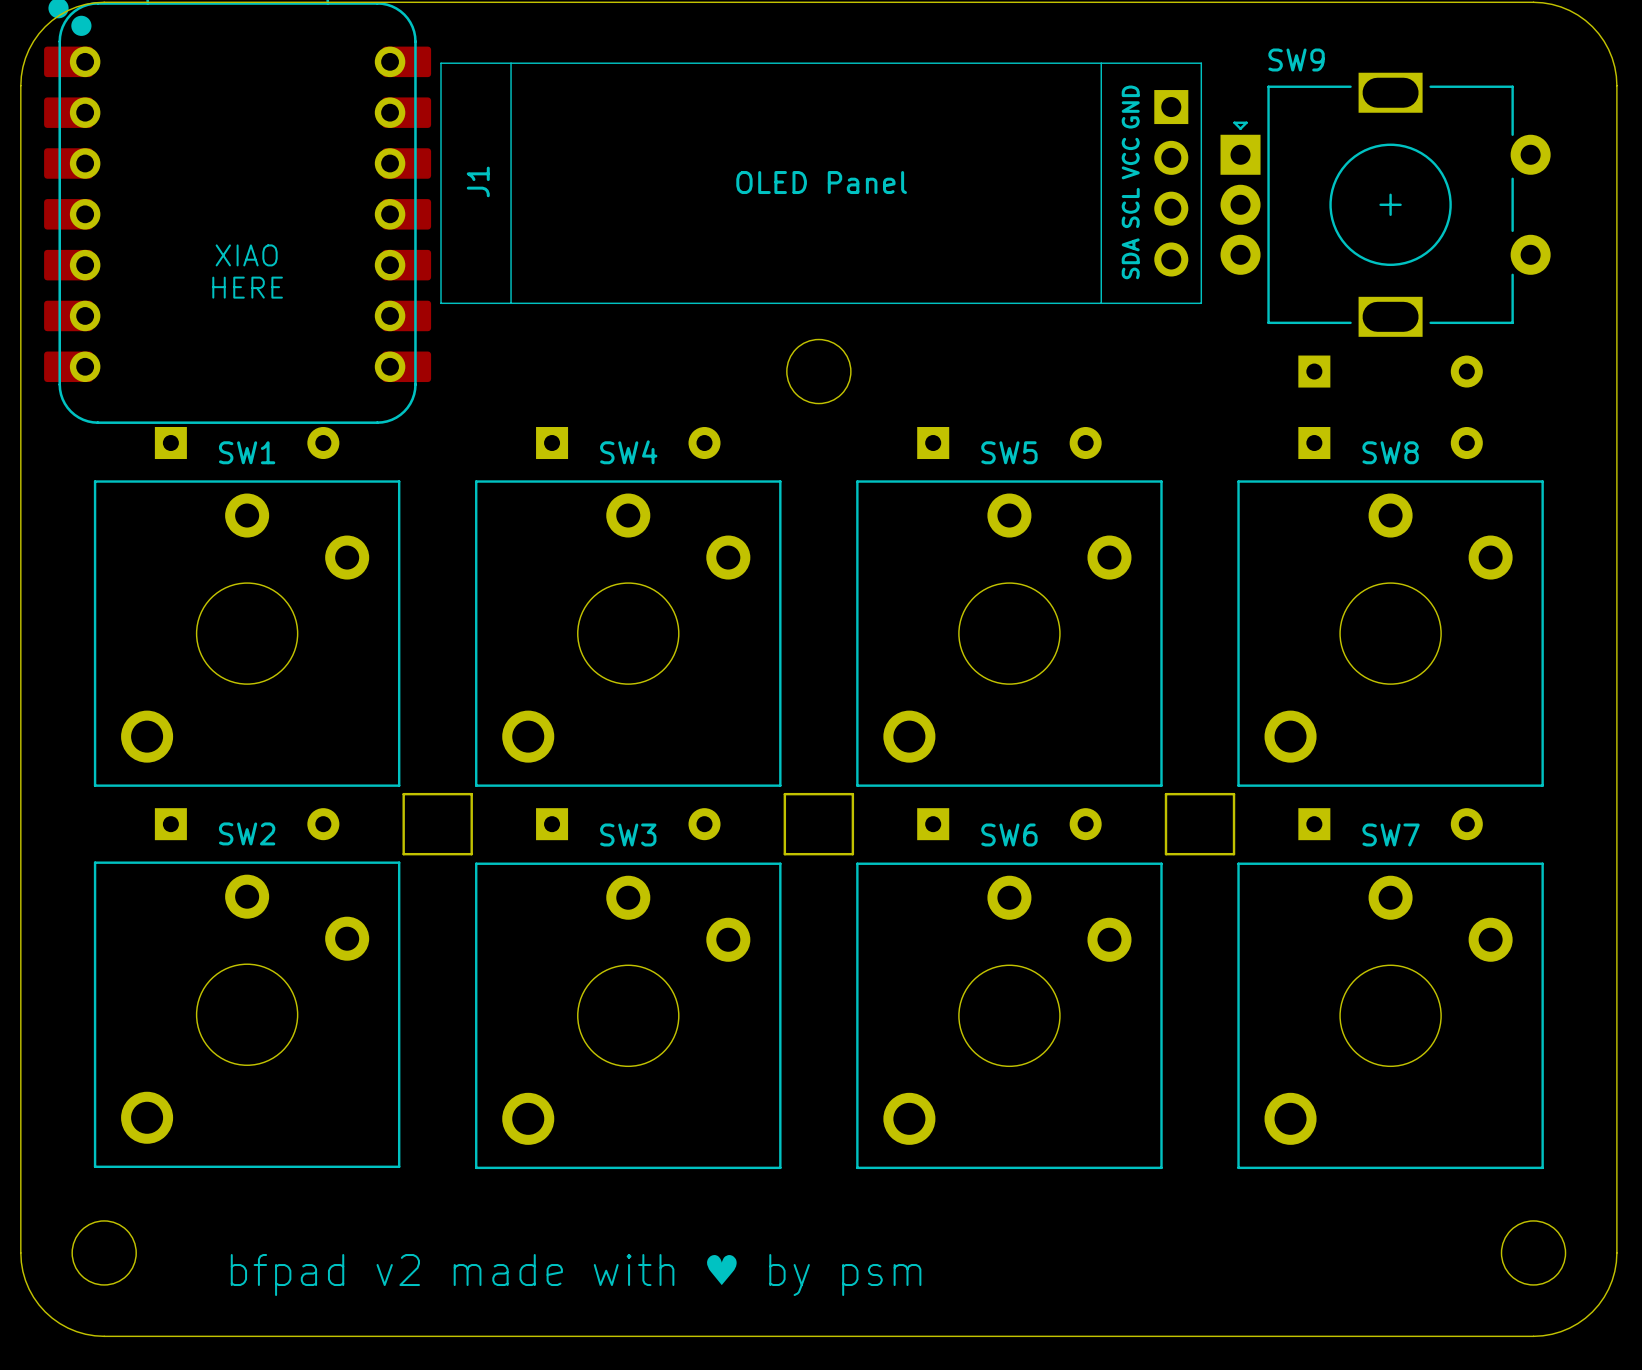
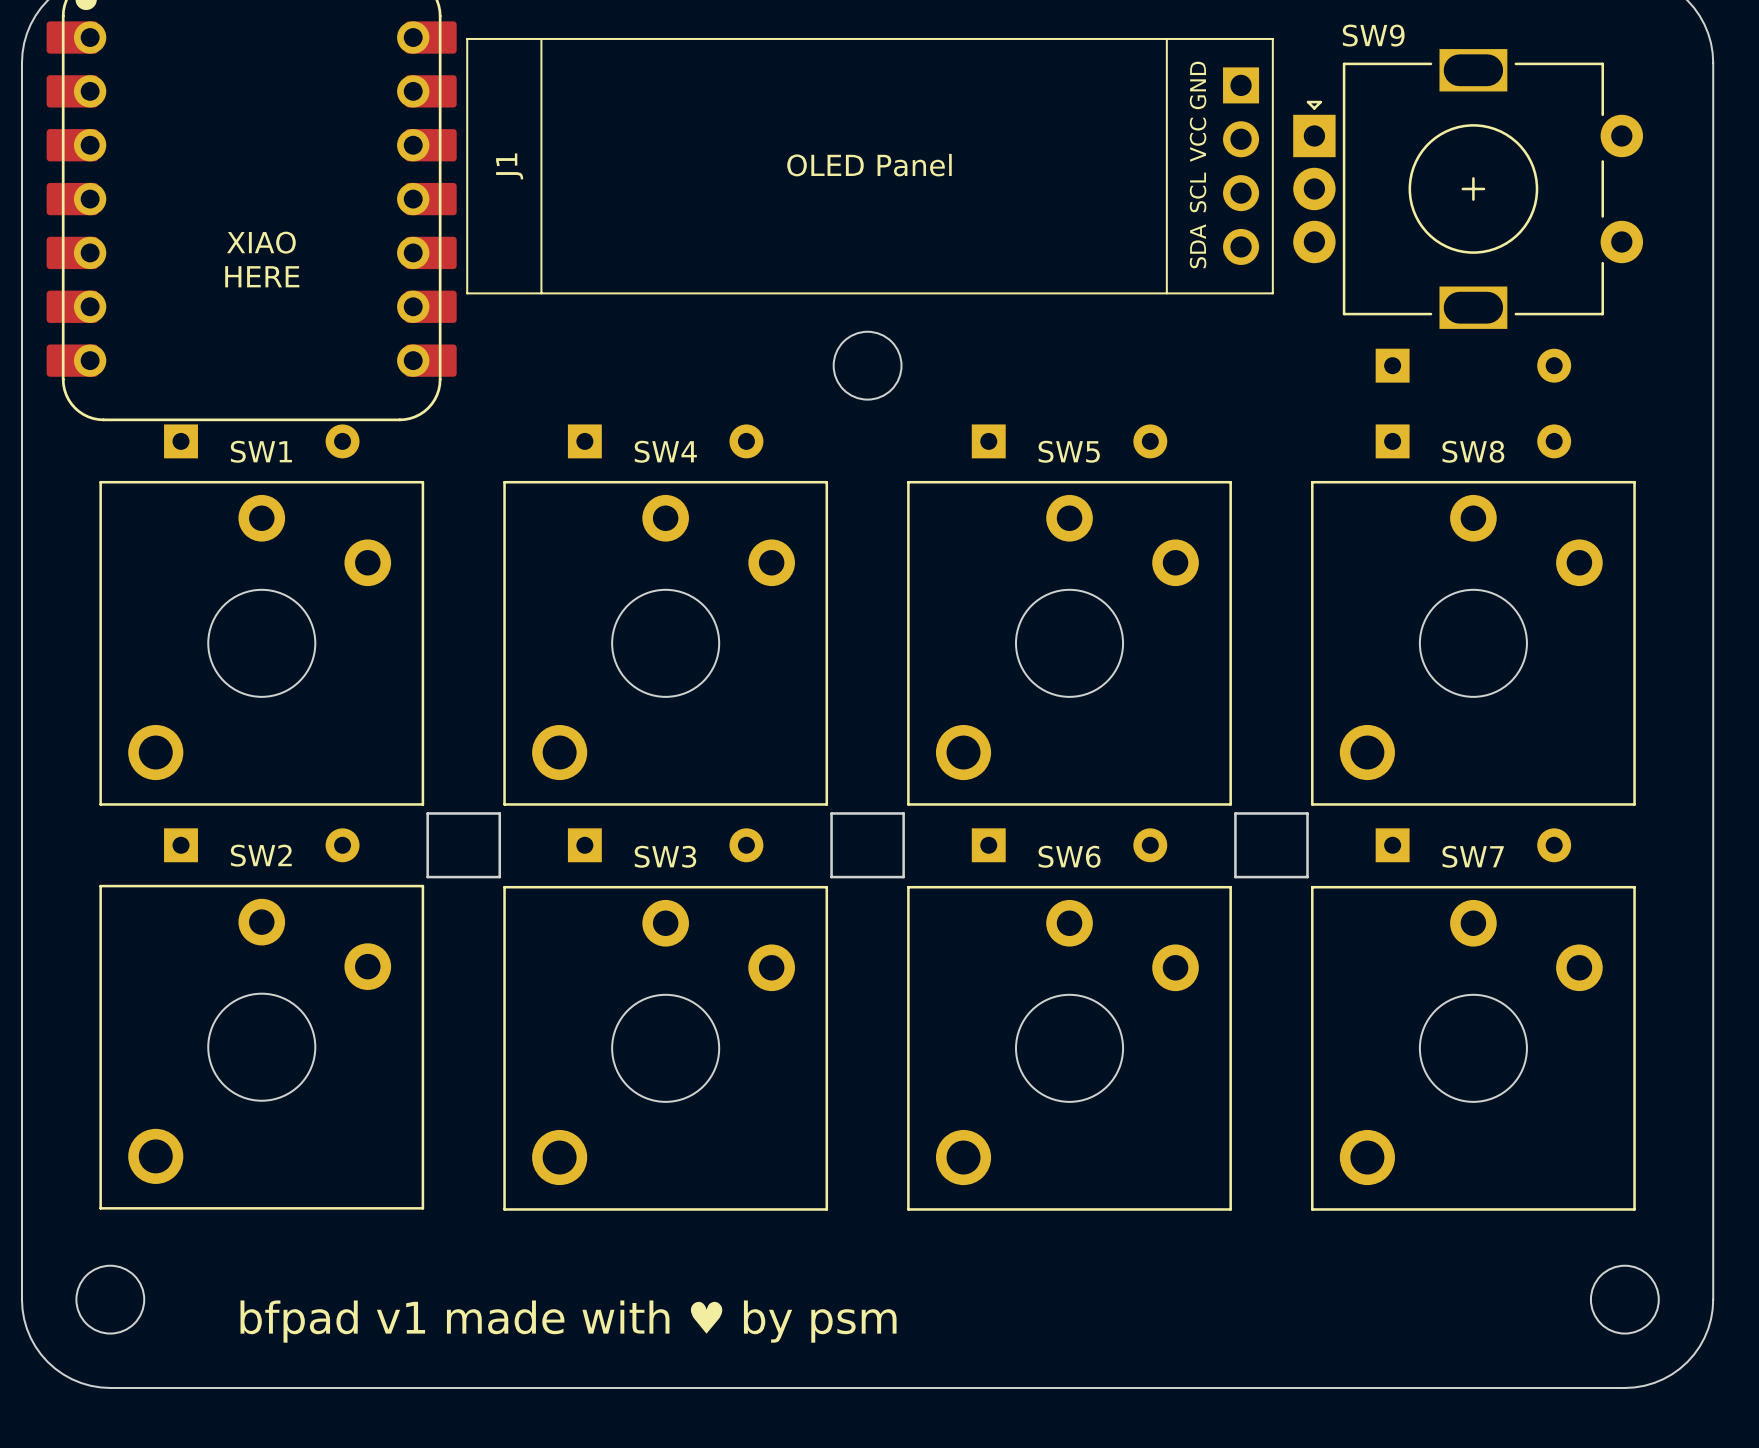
text: bfpad v2 made with ♥︎ by psm (576, 1275) -> bfpad v1 made with ♥︎ by psm (568, 1321)

